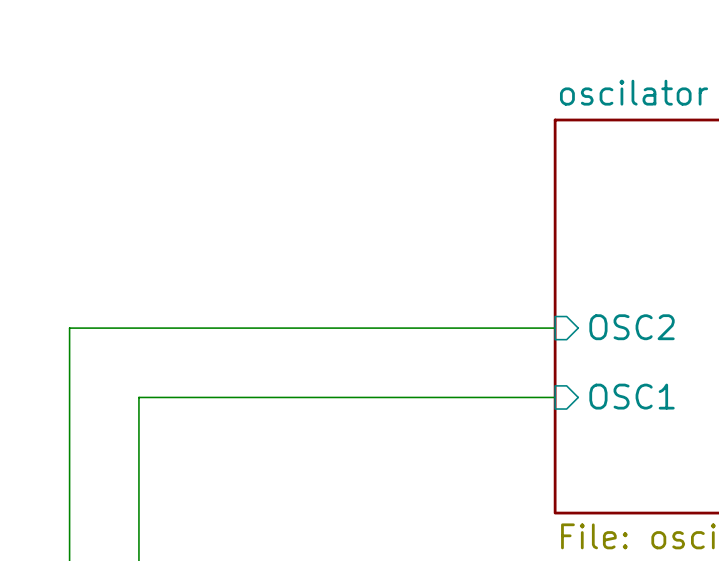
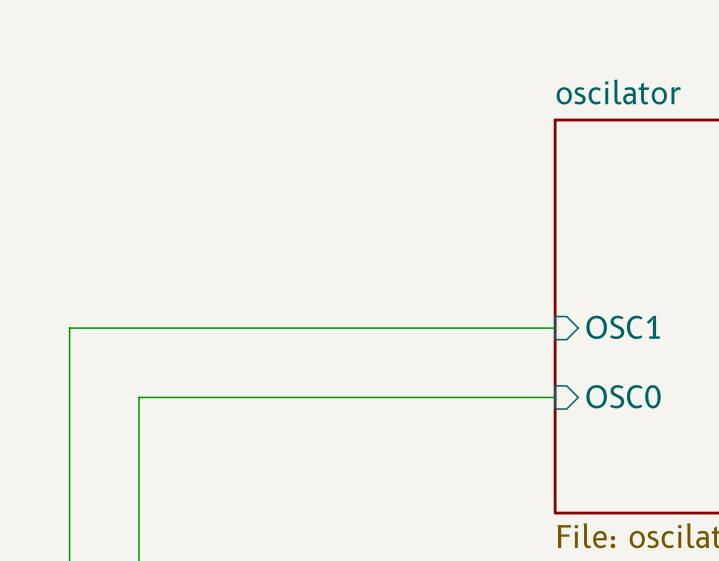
sheet pin: OSC2 (632, 327) -> OSC1 (623, 327)
sheet pin: OSC1 (632, 396) -> OSC0 (623, 396)

